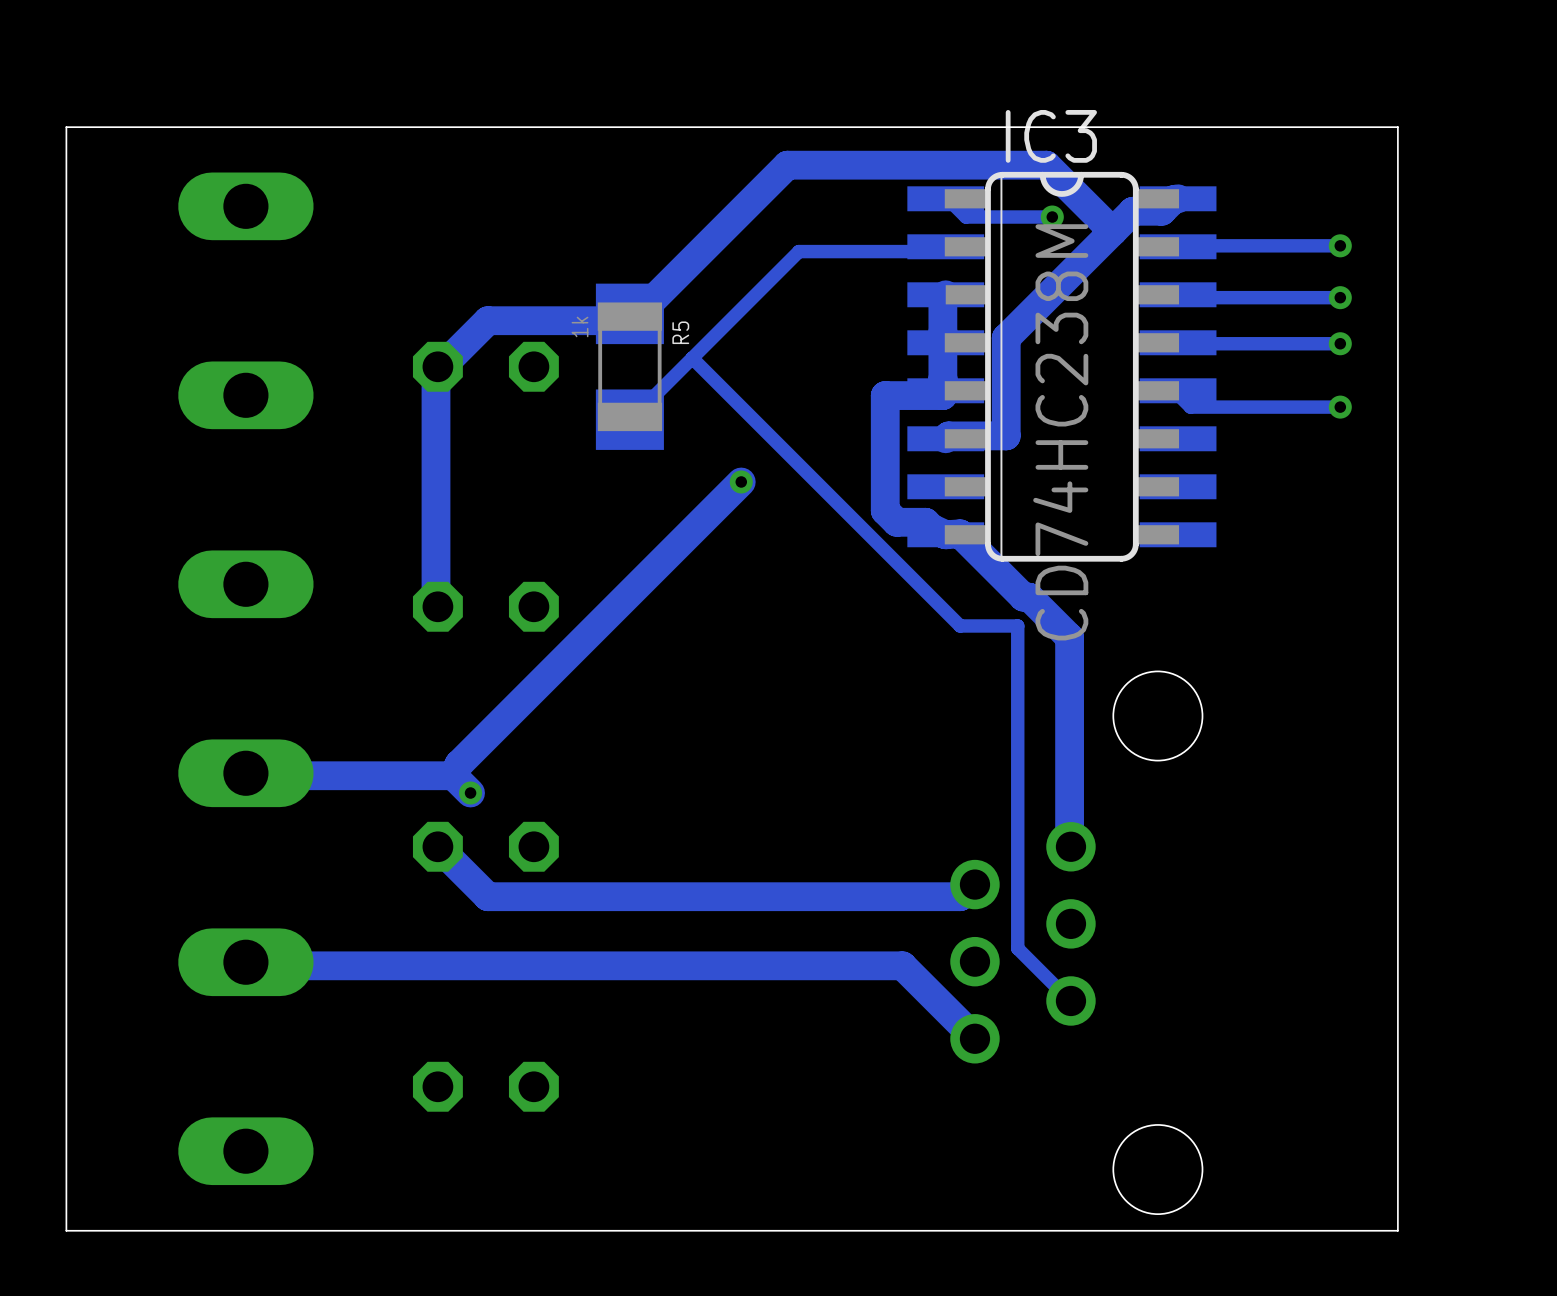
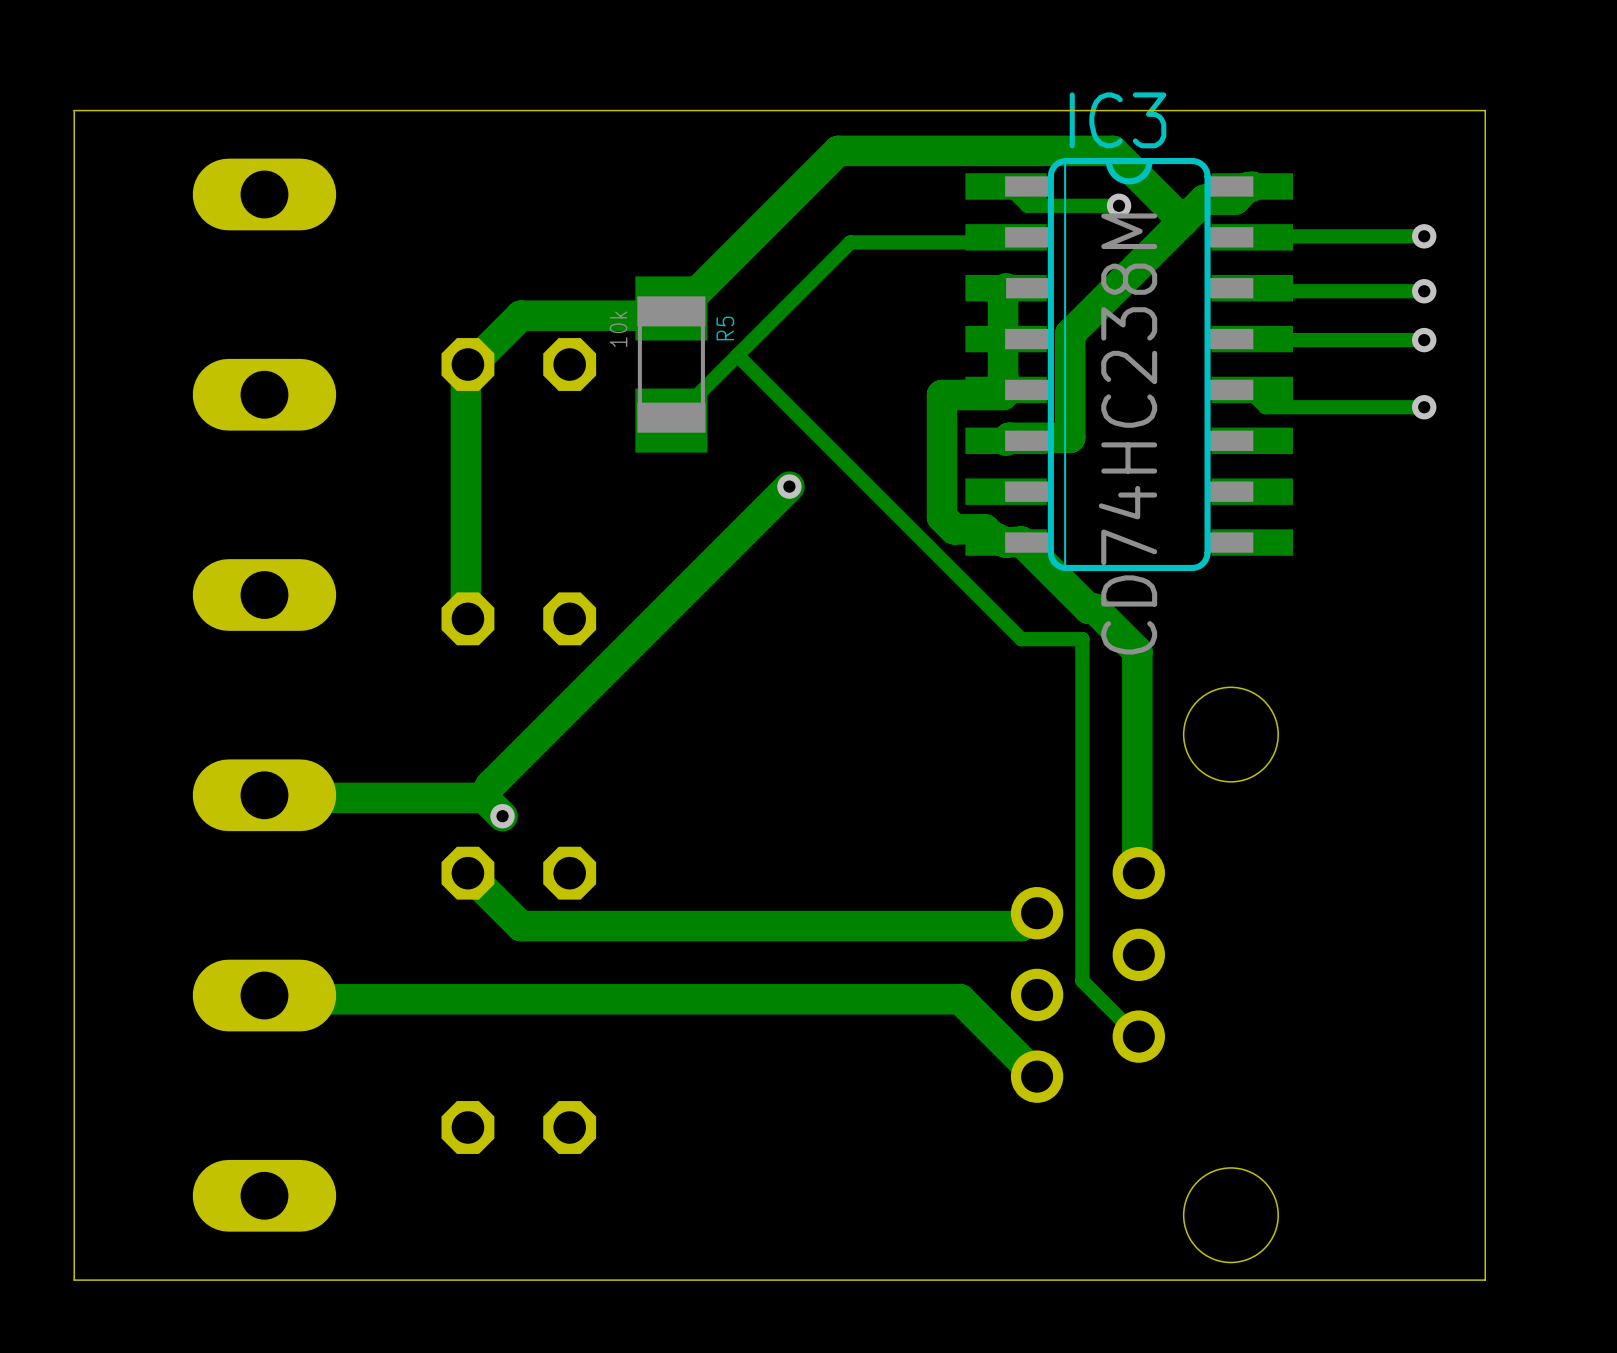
R5 value: 1k (579, 326) -> 10k (618, 329)

